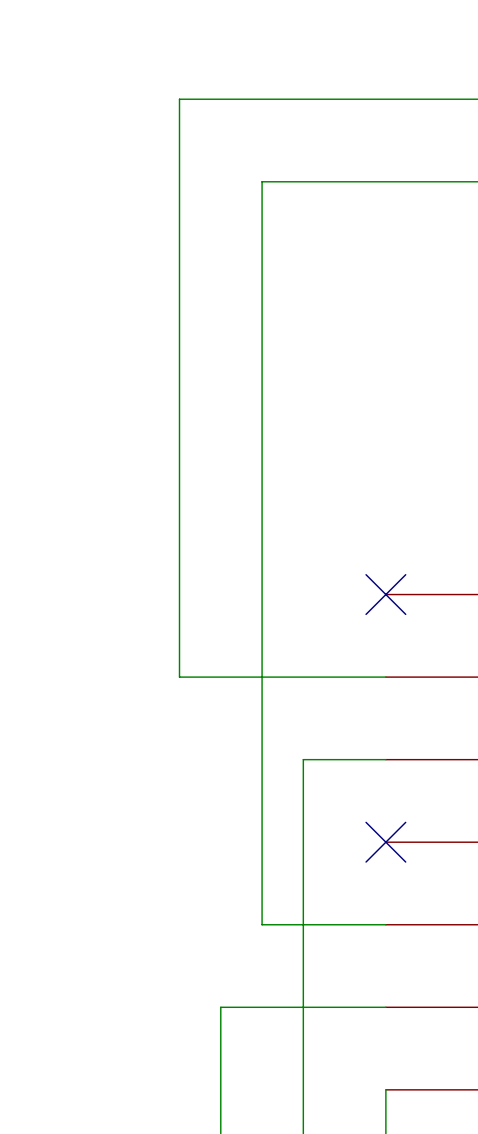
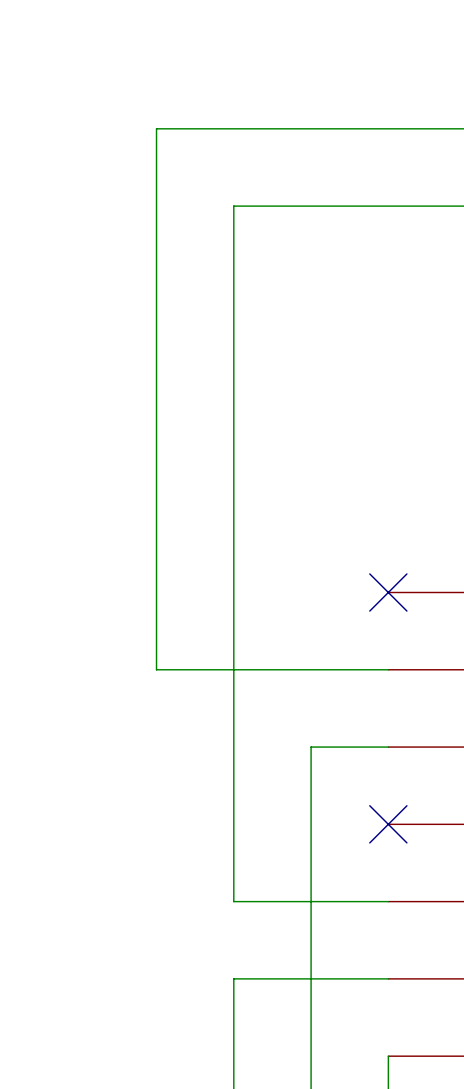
wire: (179, 99) (179, 677) -> (195, 128) (156, 128) (156, 669) (195, 669)
wire: (262, 181) (262, 924) -> (272, 206) (233, 206) (233, 901) (272, 901)

